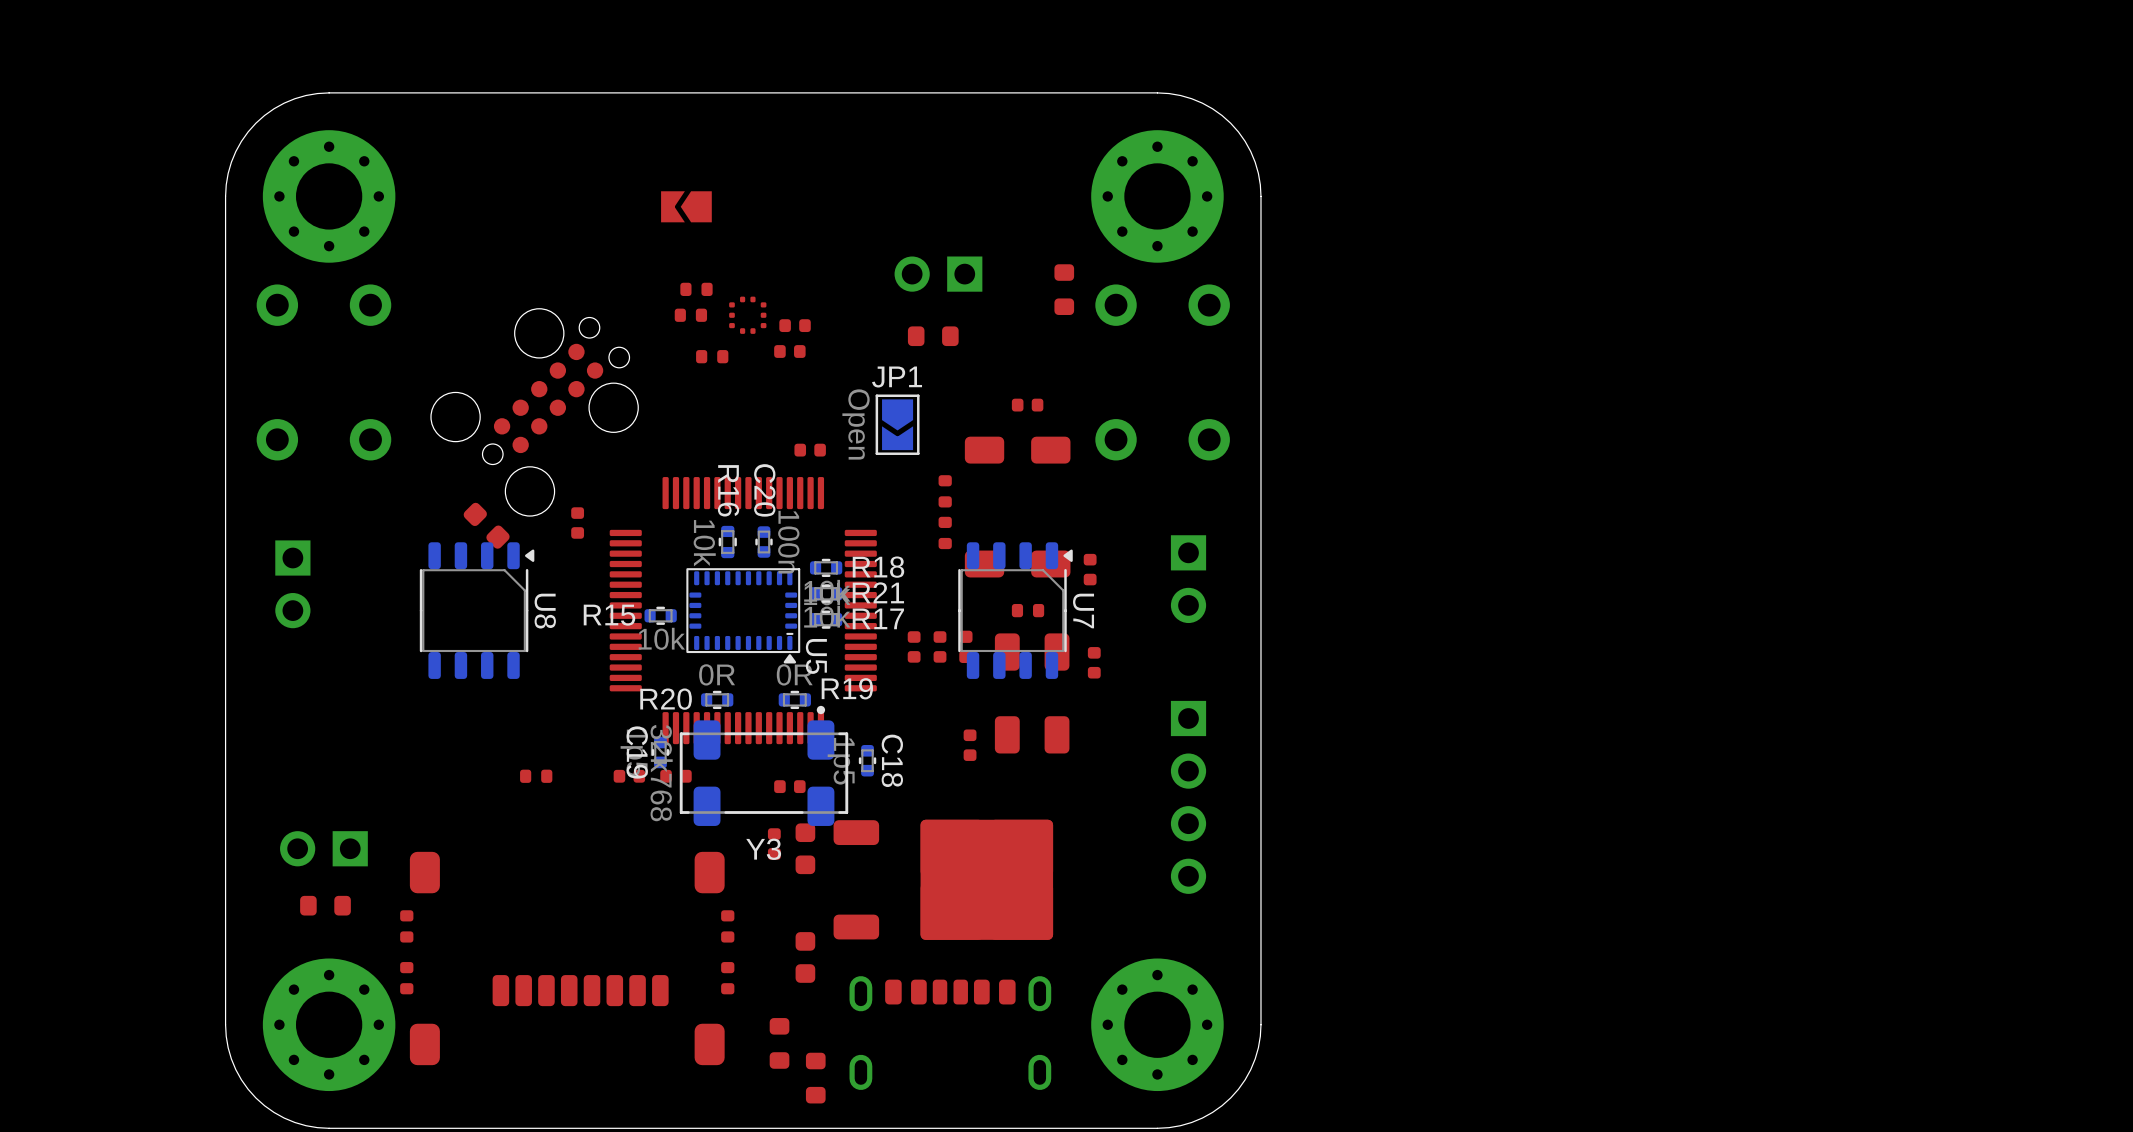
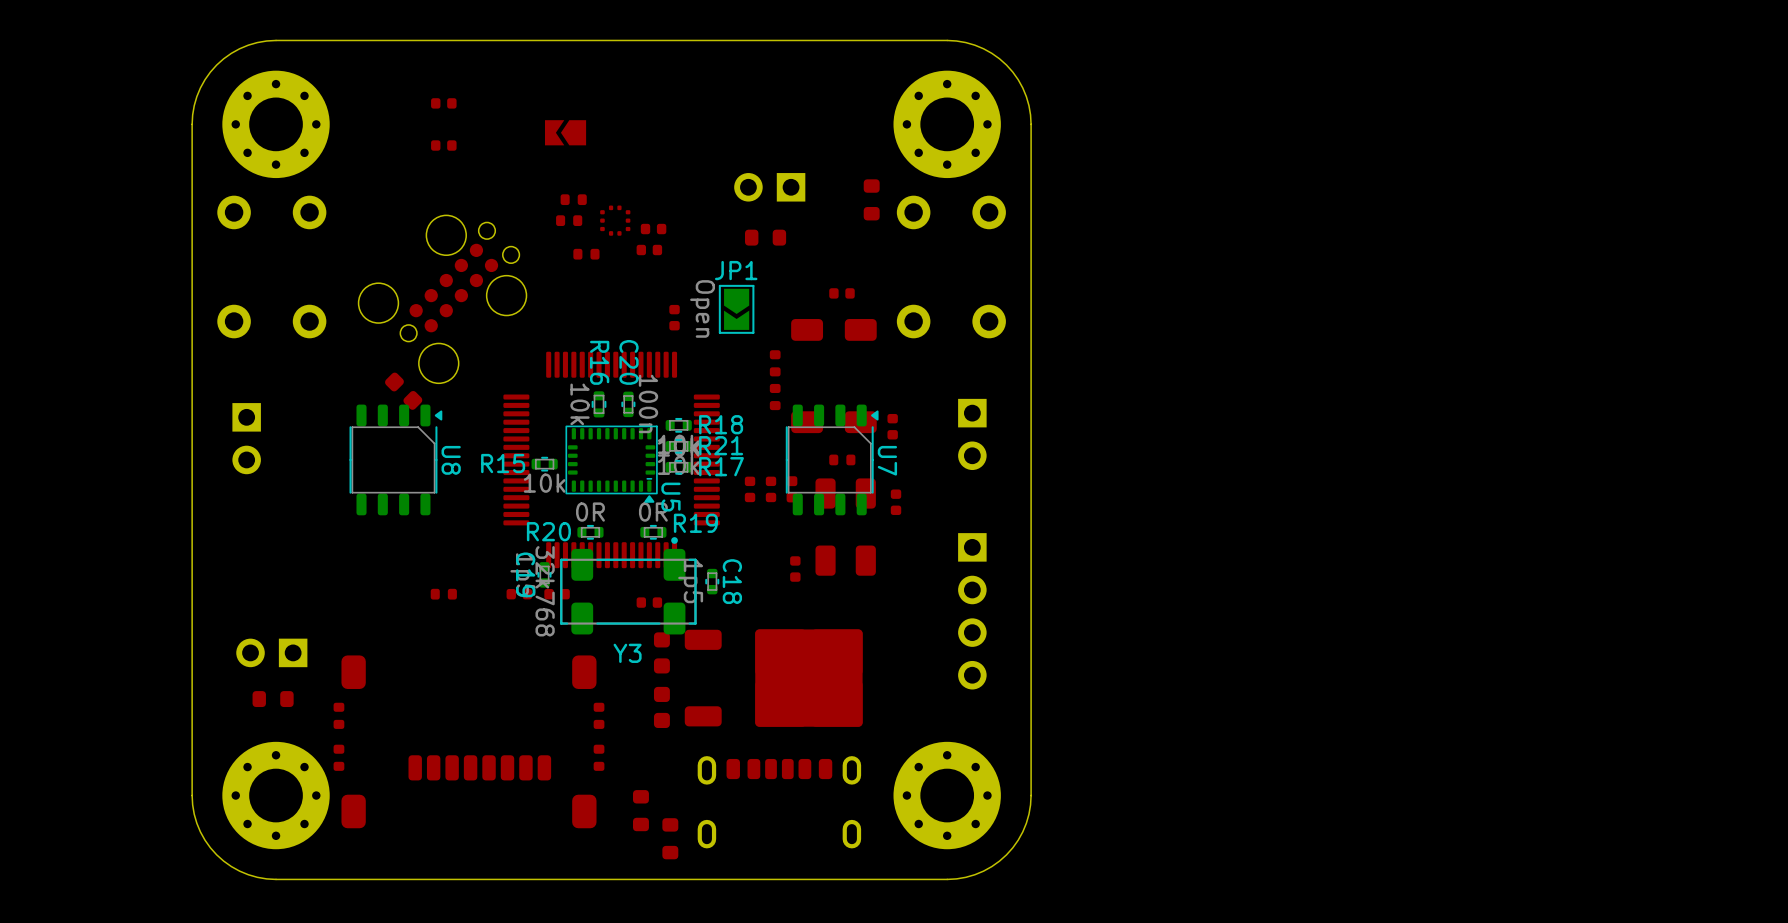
part: none -> (443, 103)
part: none -> (443, 145)
part rotation: 0° (810, 450) -> 90° clockwise (674, 317)
part: (577, 523) -> none
part: (774, 843) -> none
part position: (805, 957) -> (661, 707)

